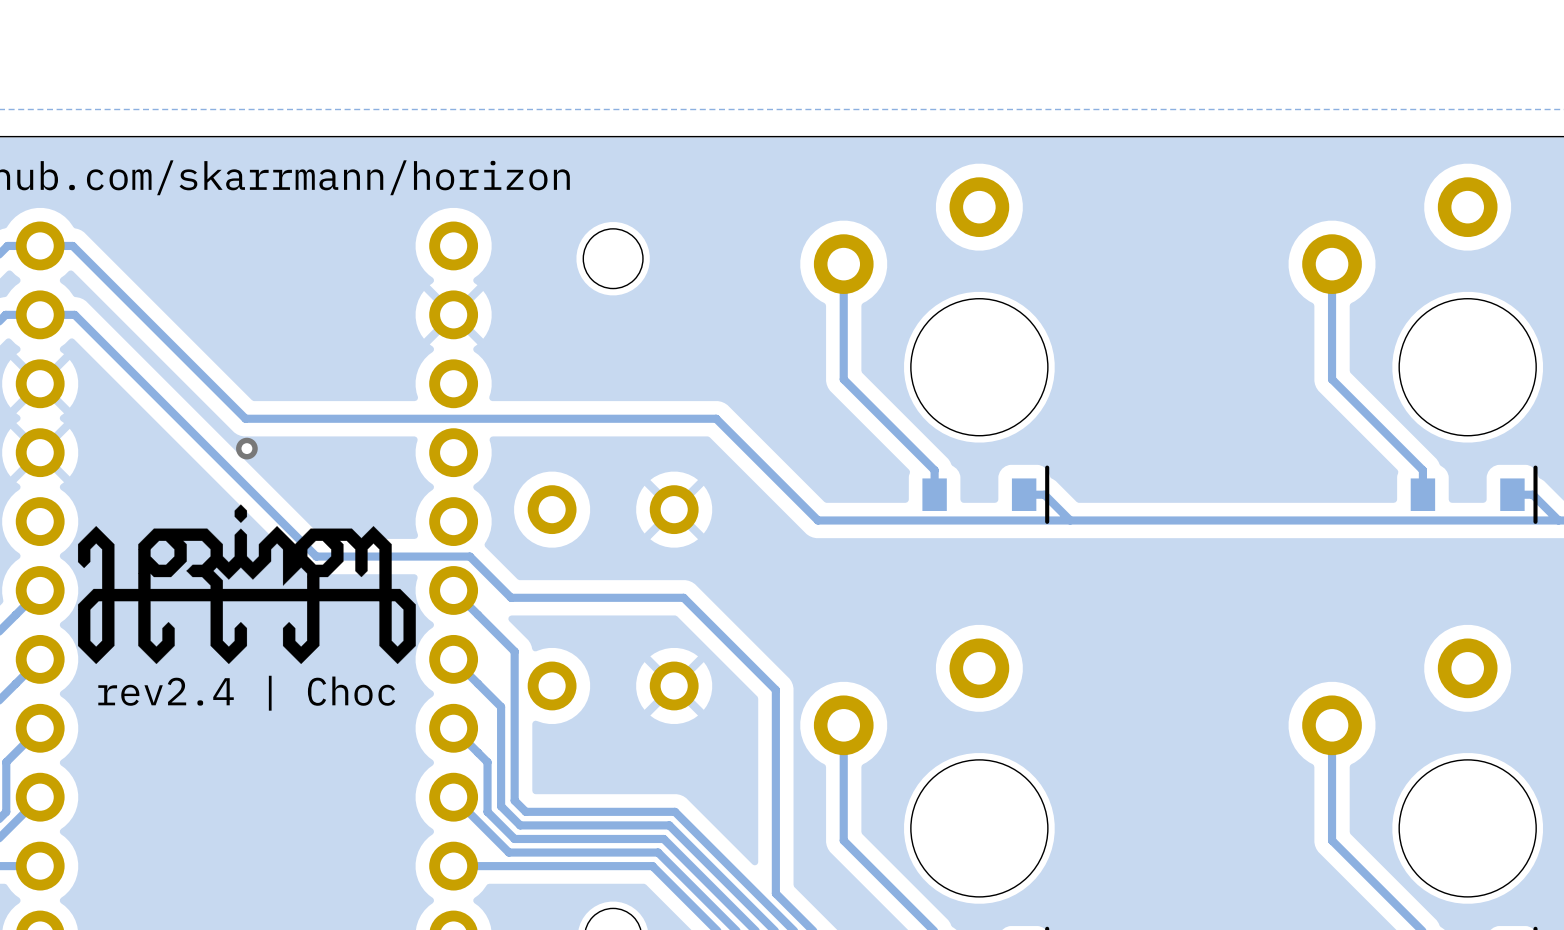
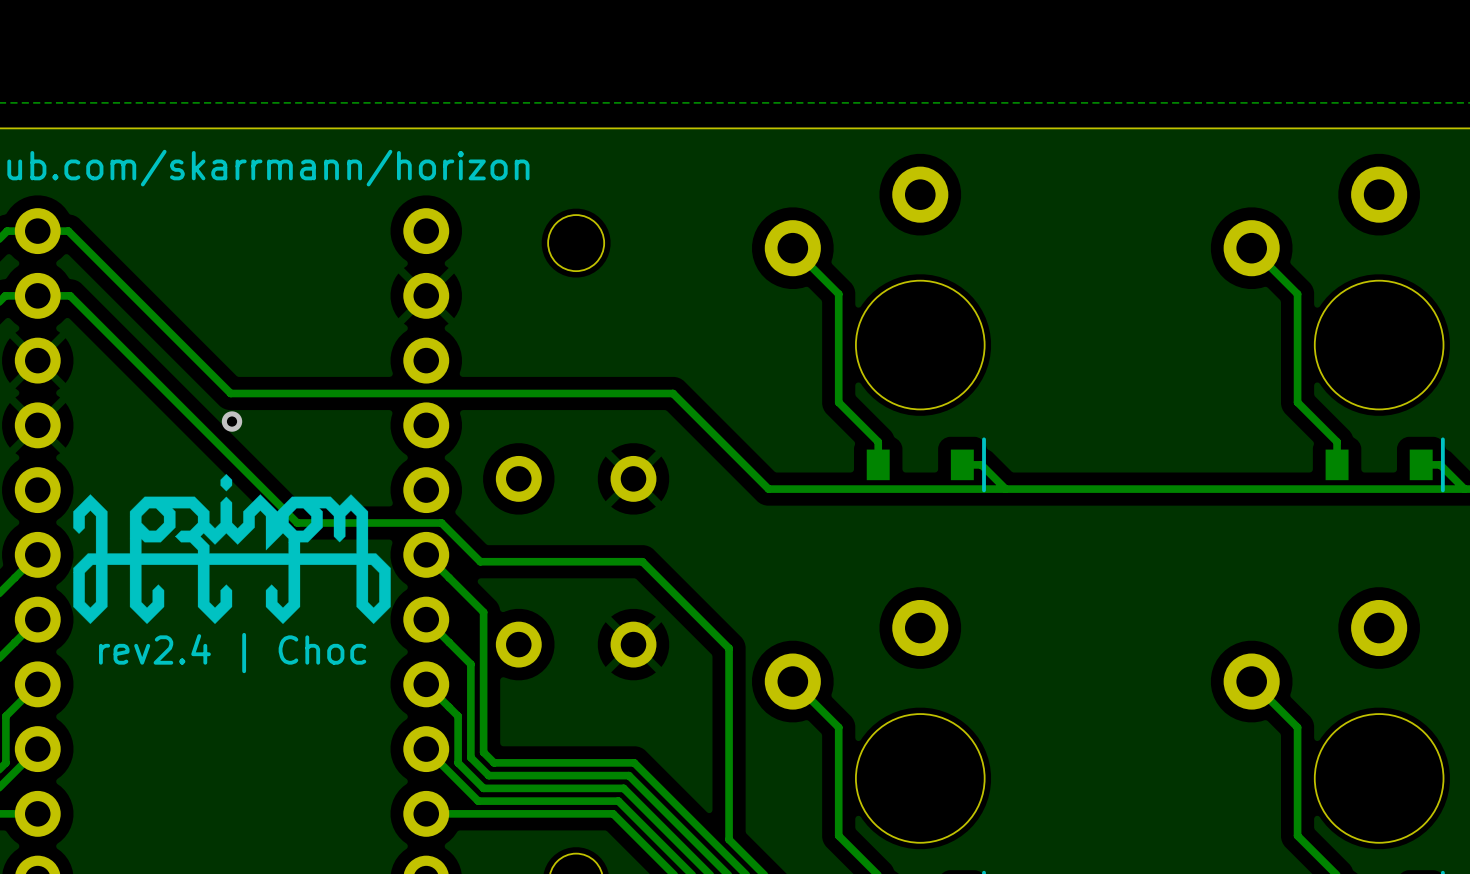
track: (843, 264) (843, 379) (892, 428) -> (792, 248) (838, 294) (838, 402)
track: (1332, 264) (1332, 379) (1380, 428) -> (1251, 248) (1297, 294) (1297, 402)
track: (843, 725) (843, 840) (892, 889) -> (792, 681) (838, 727) (838, 835)
track: (1332, 725) (1332, 840) (1380, 889) -> (1251, 681) (1297, 727) (1297, 835)

